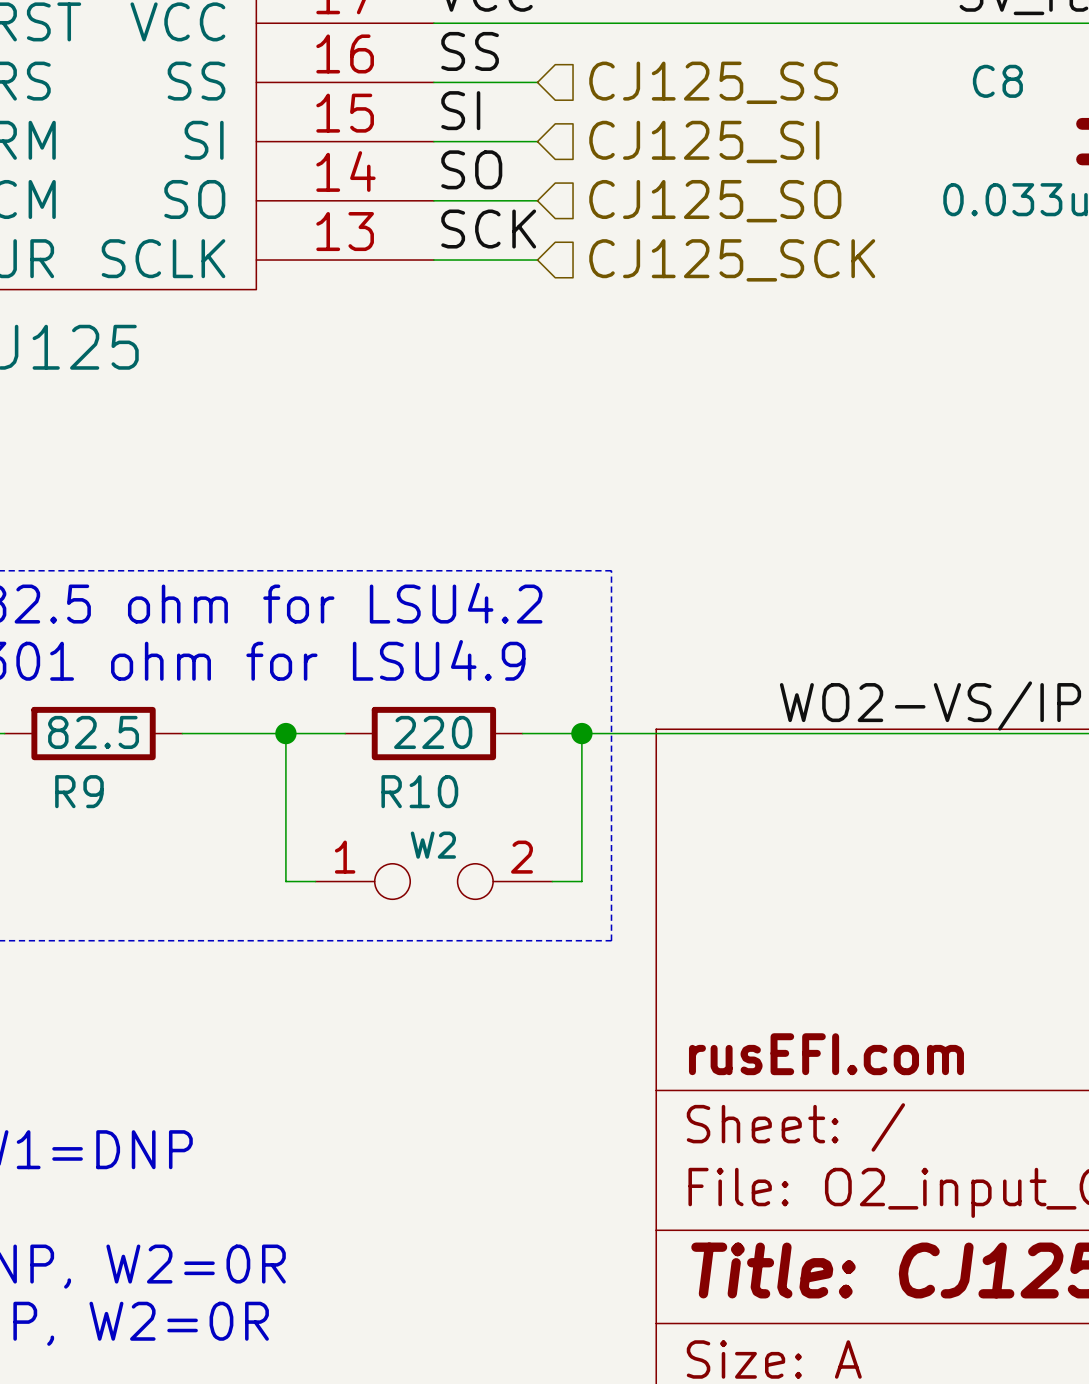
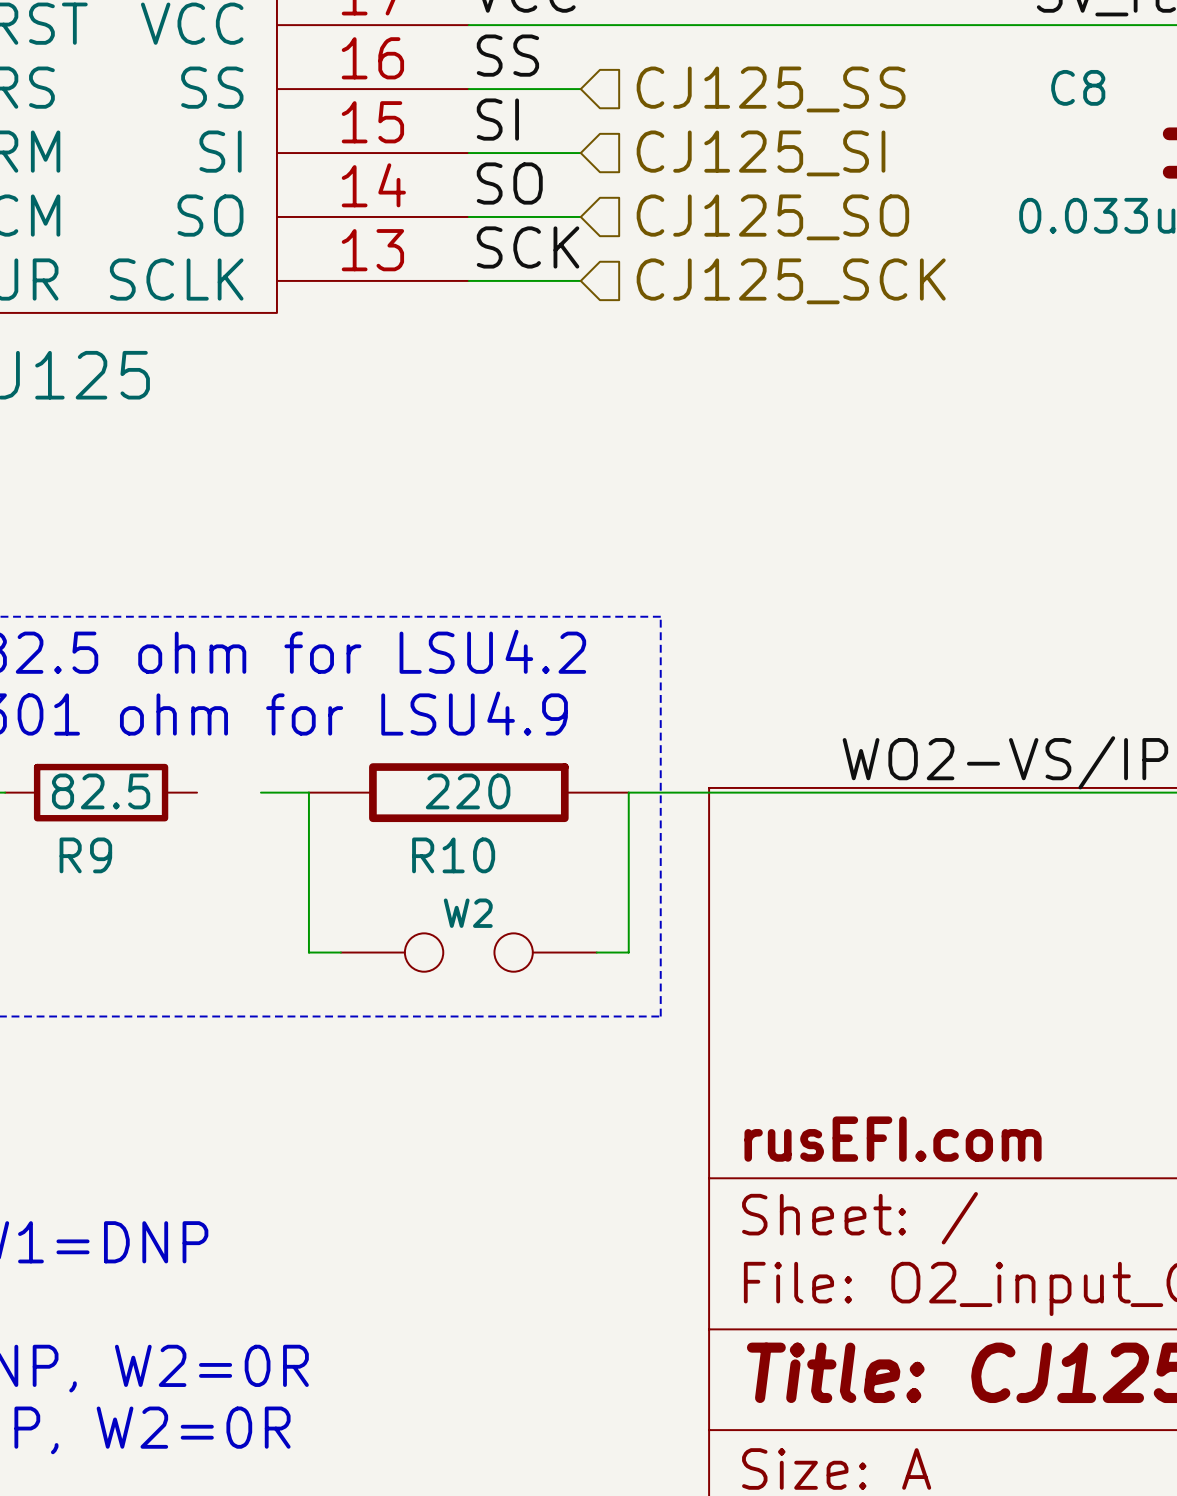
R10 symbol: [345, 706, 523, 761] -> [308, 763, 629, 823]
wire: (182, 733) (241, 733) -> none
junction: (285, 733) -> none
junction: (581, 733) -> none
W2 pin number: 1 (345, 857) -> none
W2 pin number: 2 (522, 857) -> none

